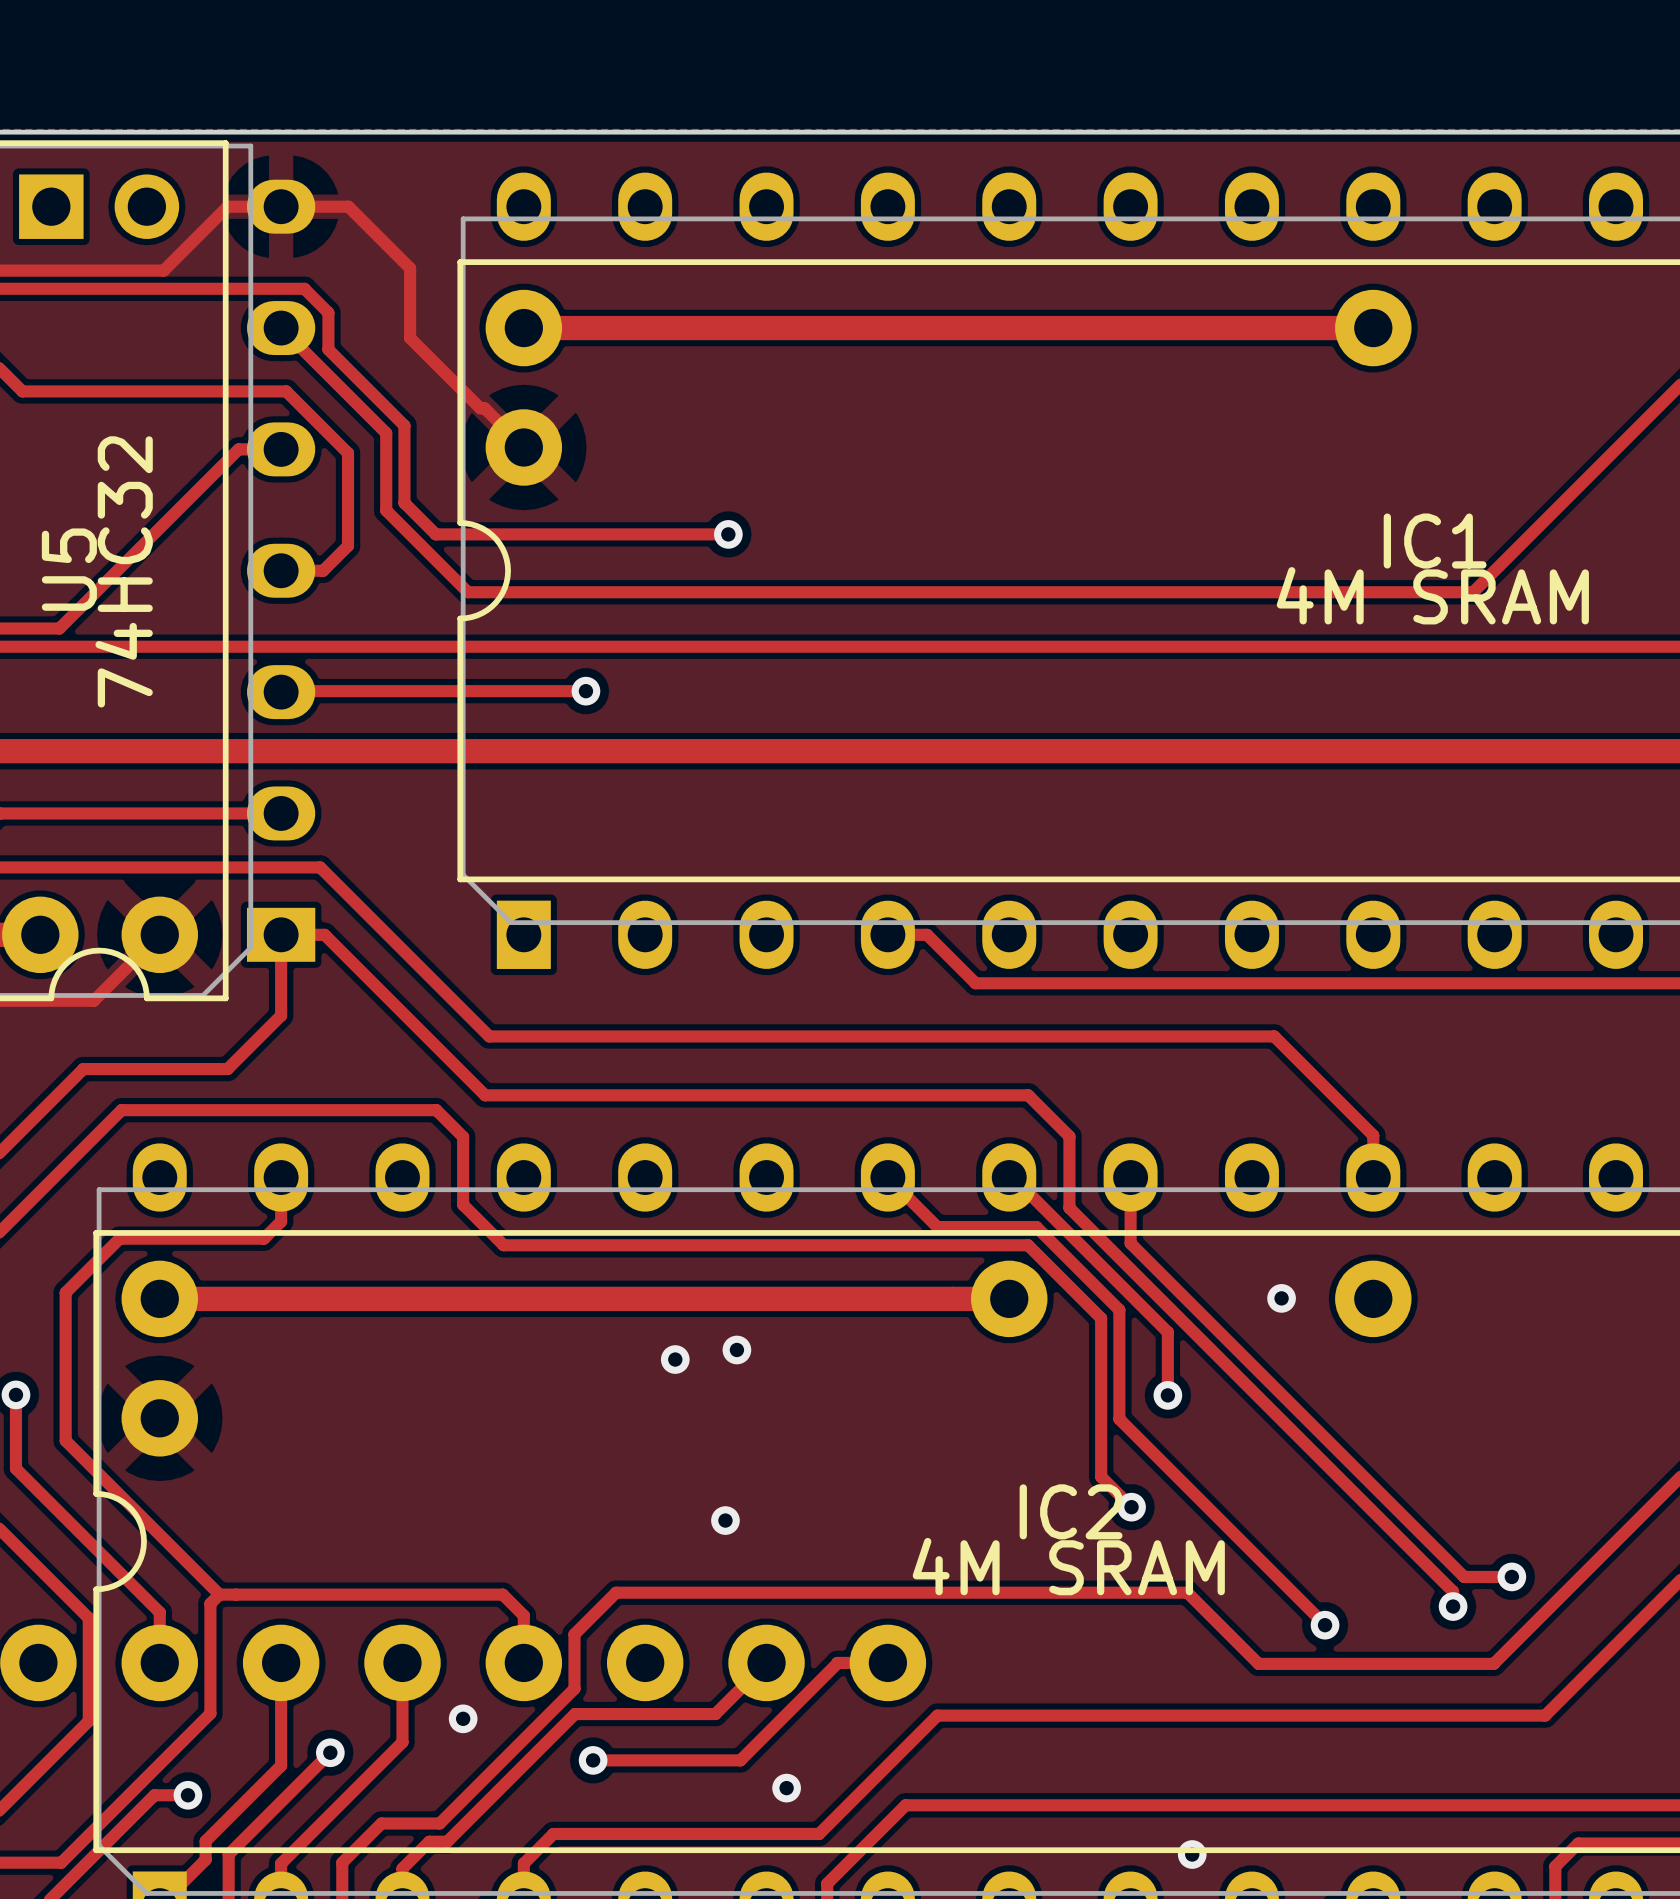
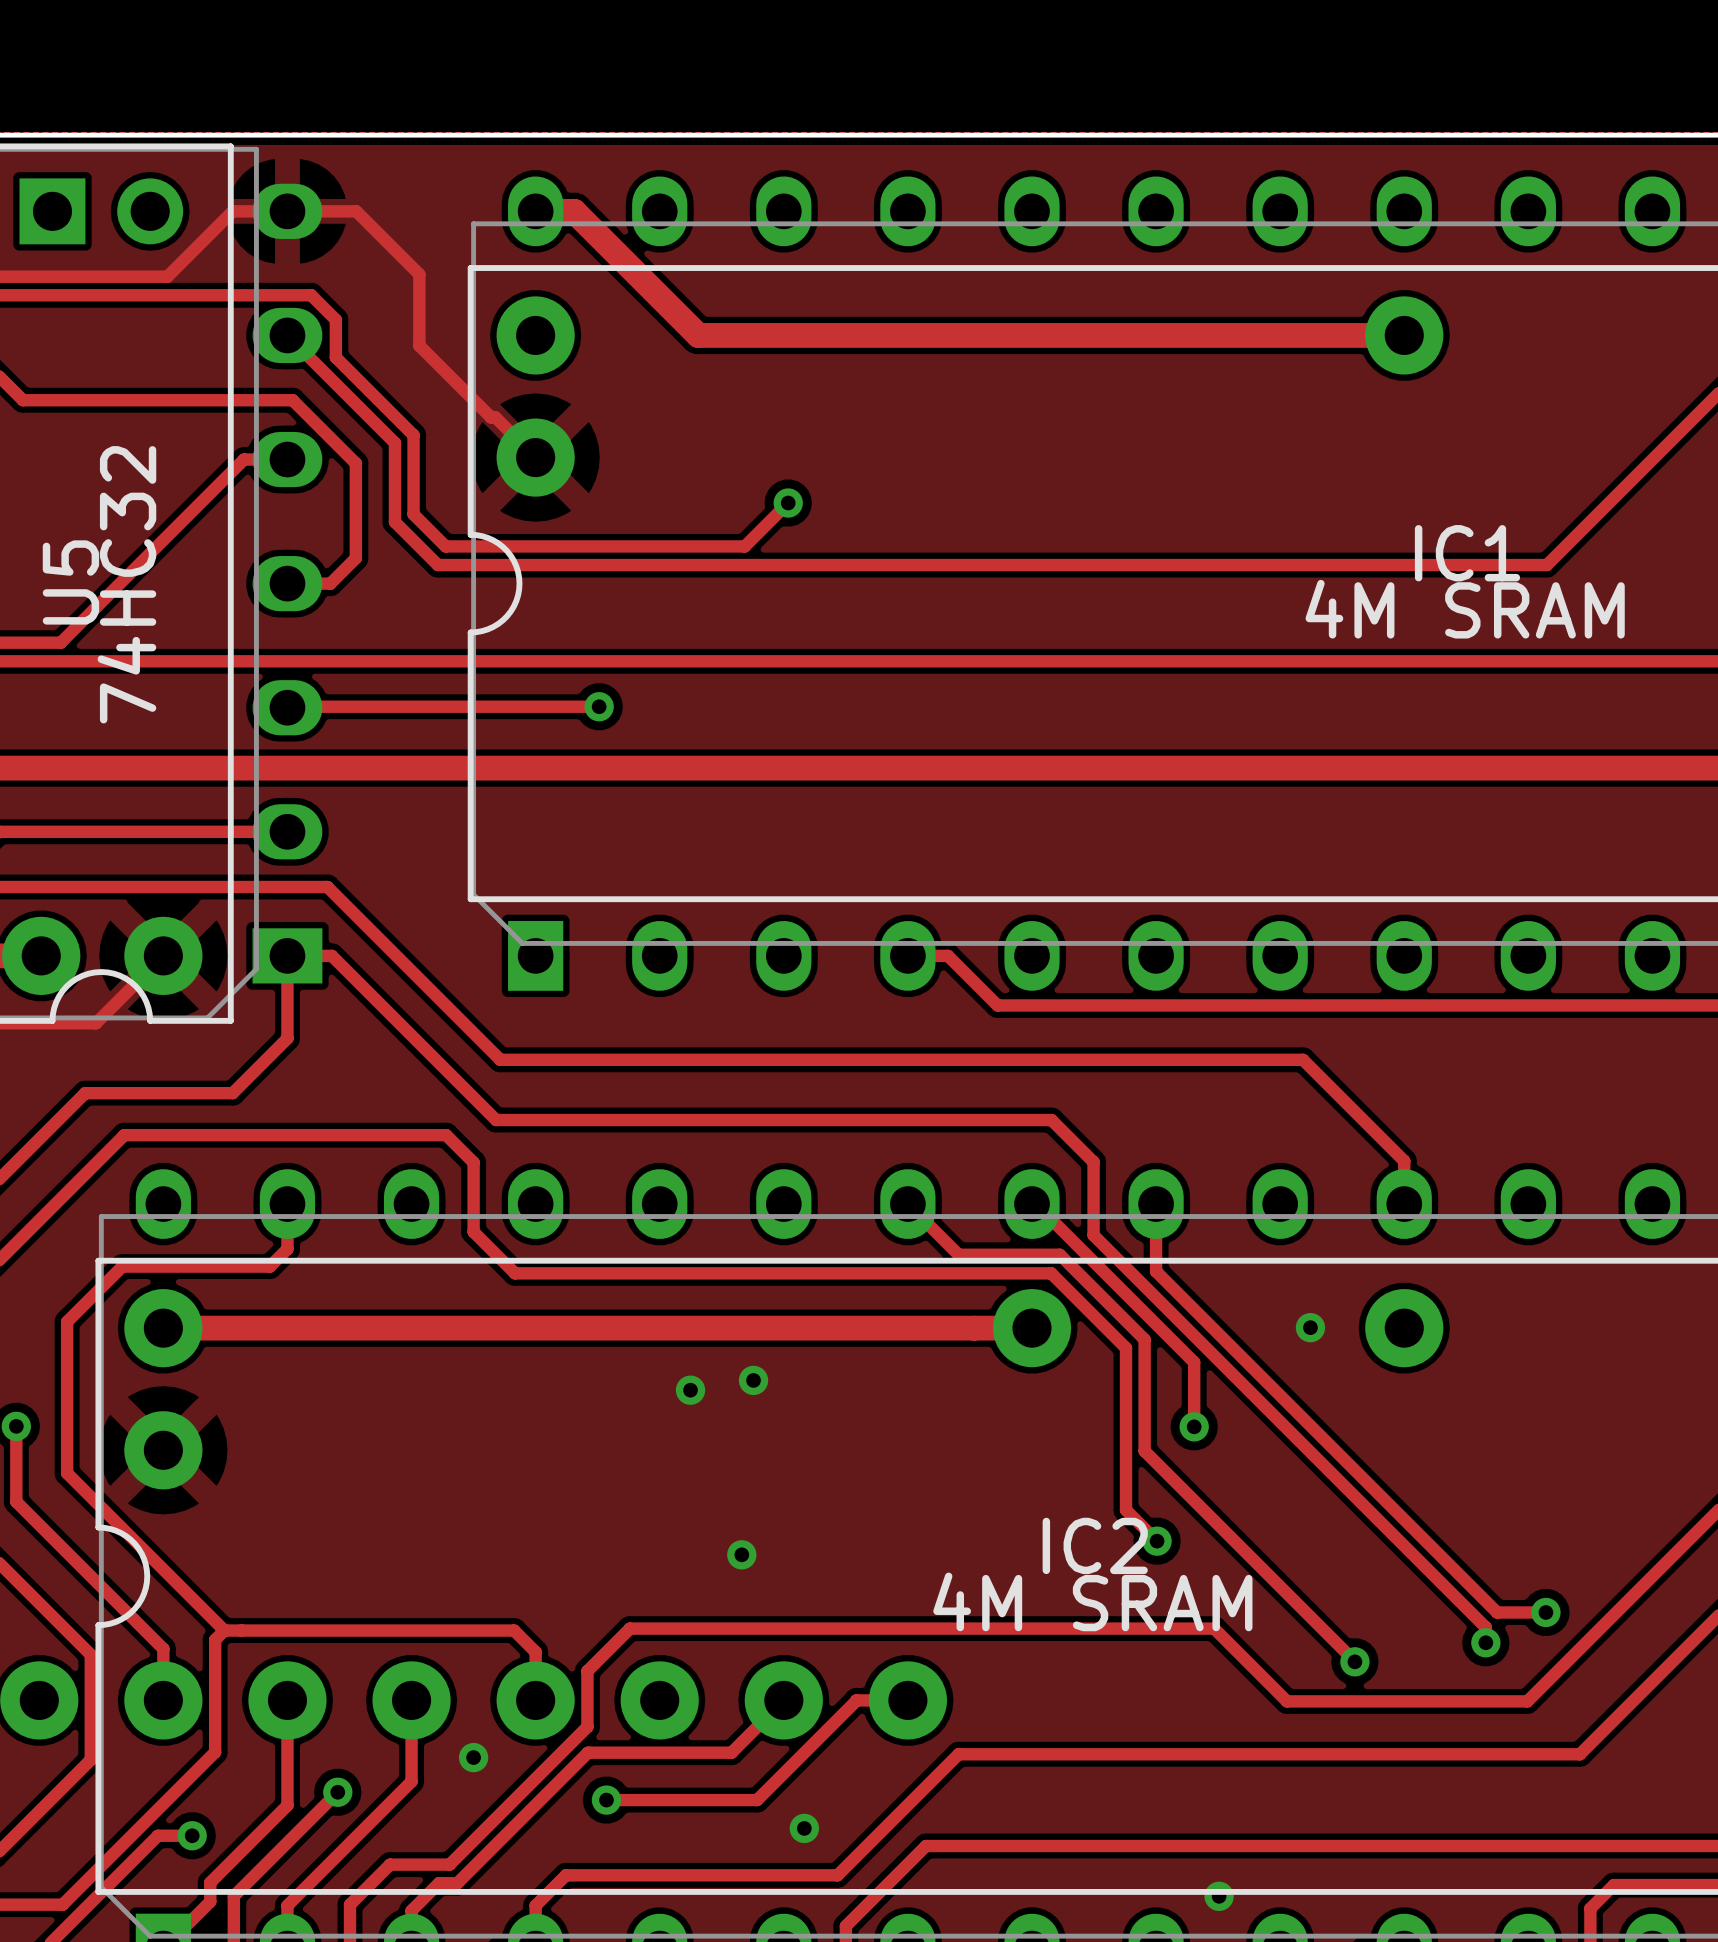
track: (523, 328) (682, 328) -> (535, 211) (574, 211) (698, 335)
track: none -> (788, 503) (744, 546)
via position: (728, 534) -> (788, 503)
track: (428, 552) (467, 592) (1473, 592) (1512, 552) -> (437, 565) (1546, 565)

